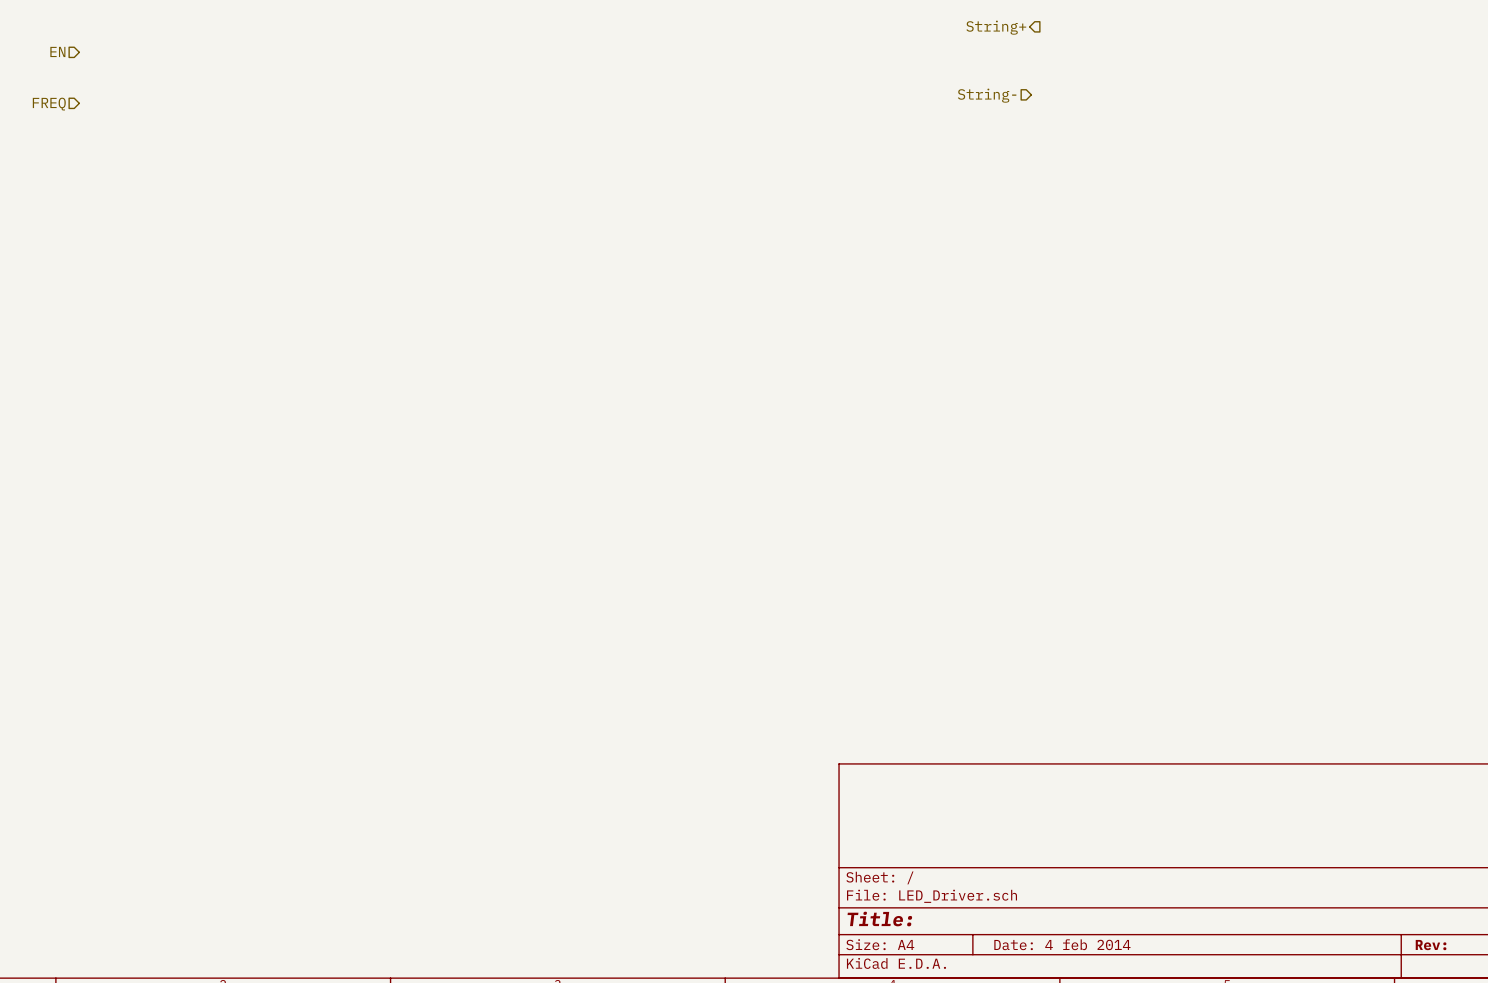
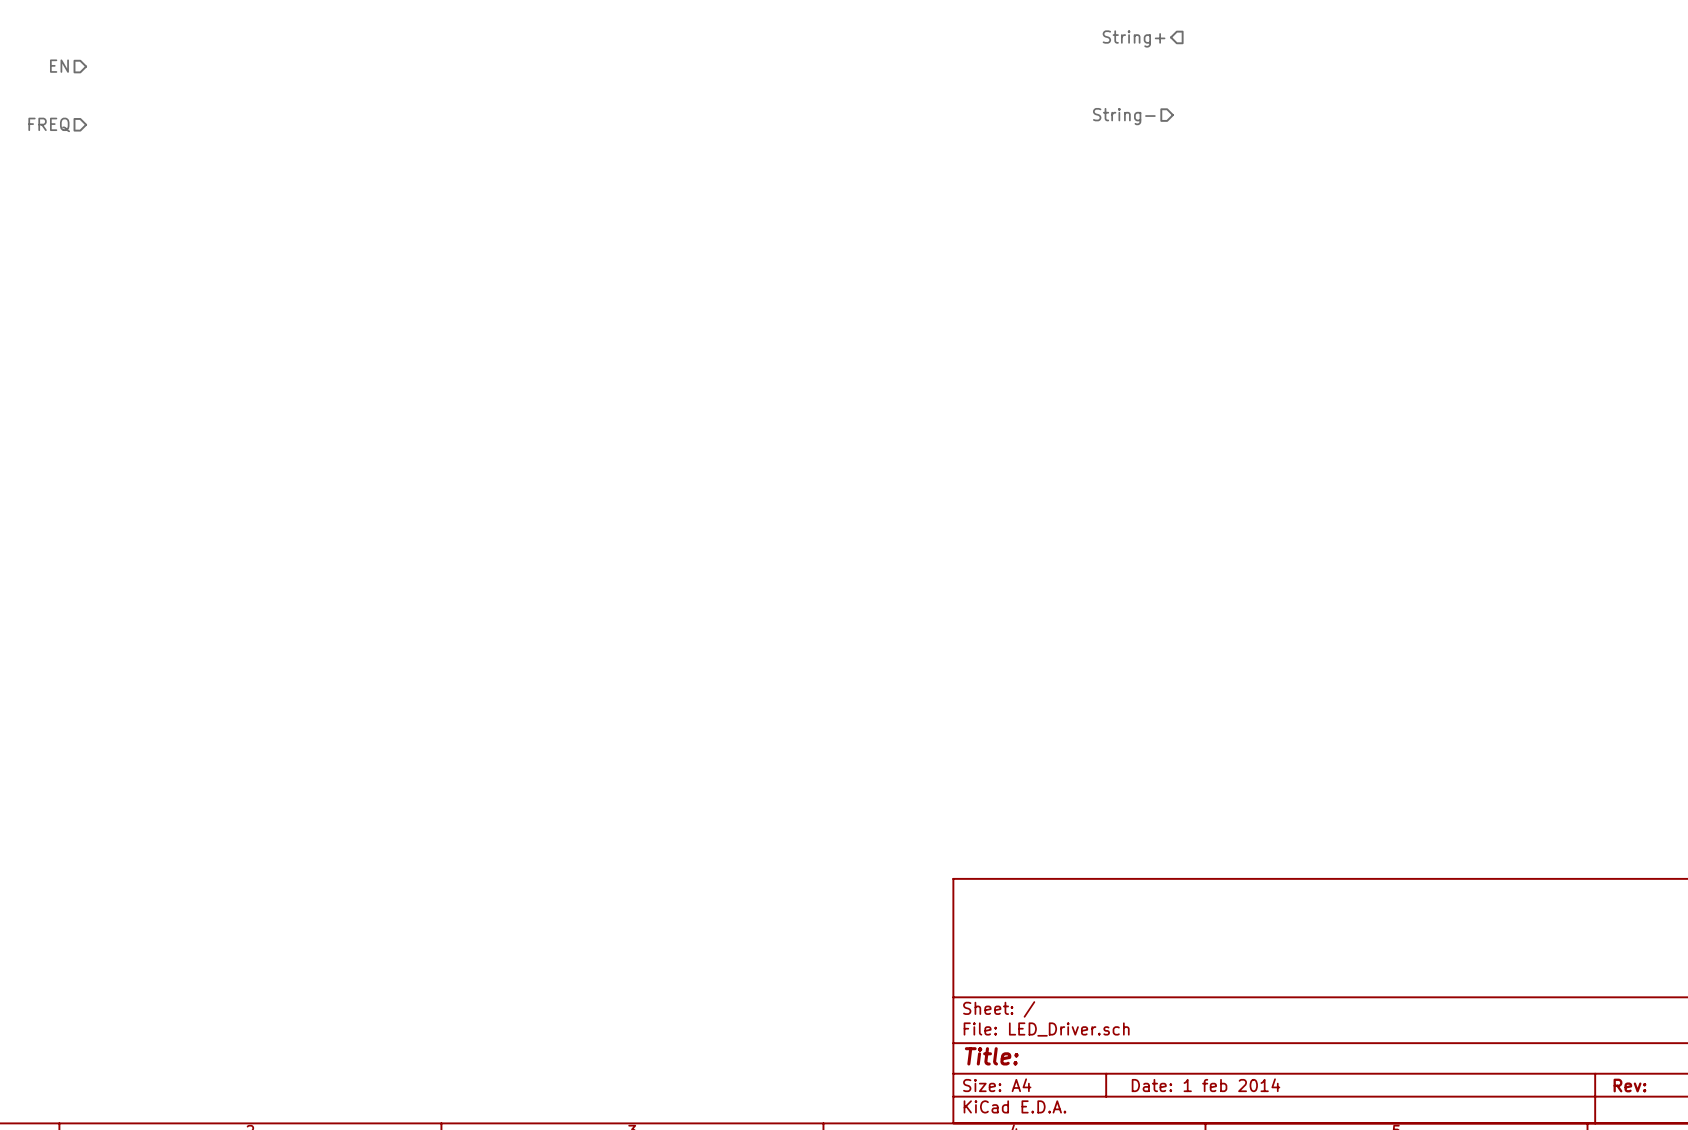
title block: Date: 4 feb 2014 (1062, 944) -> Date: 1 feb 2014 (1206, 1085)

